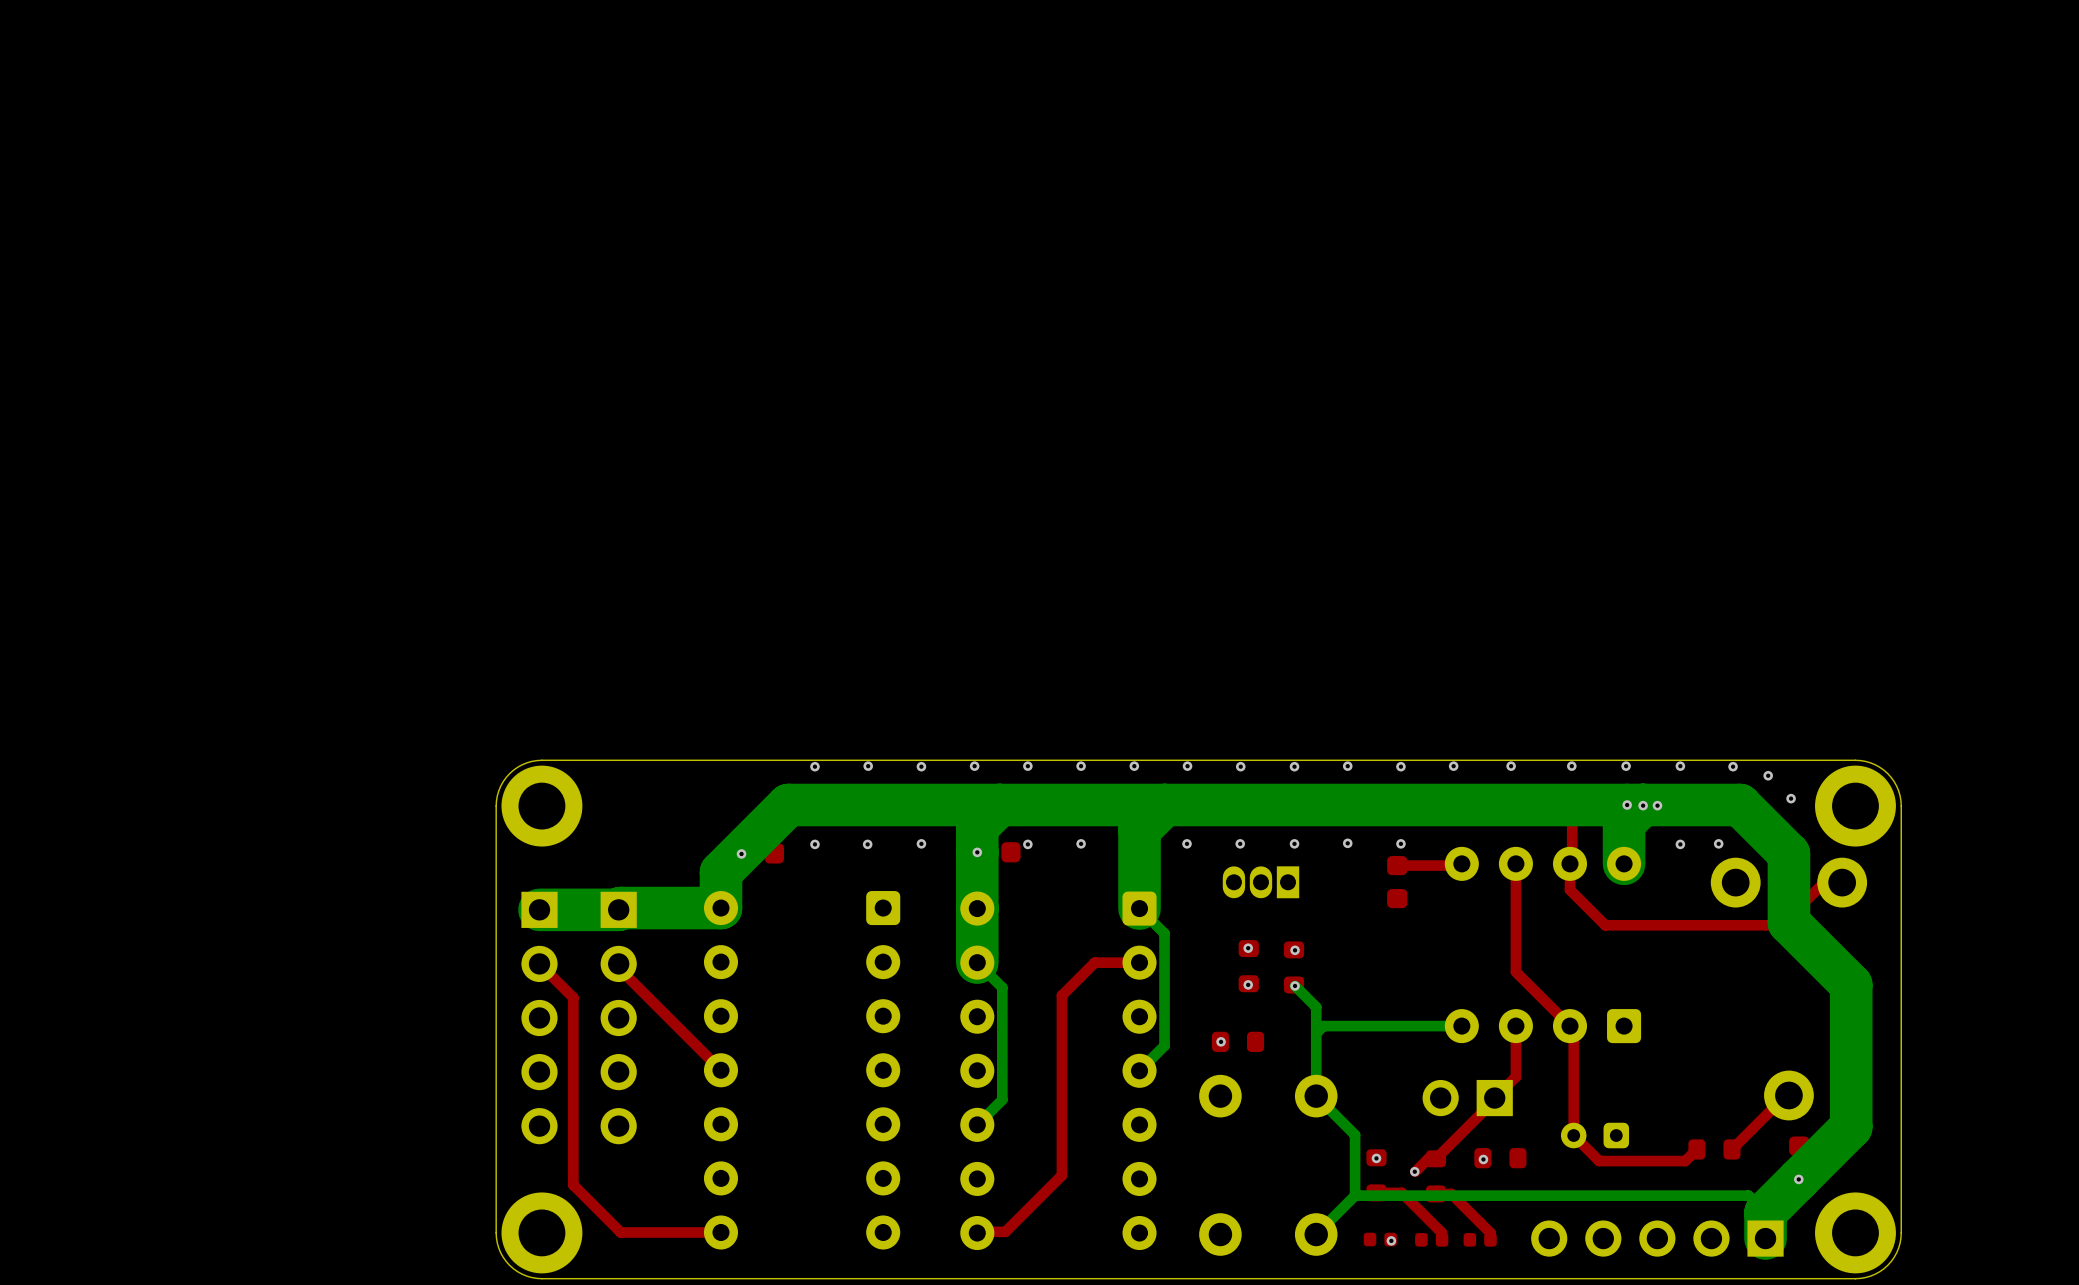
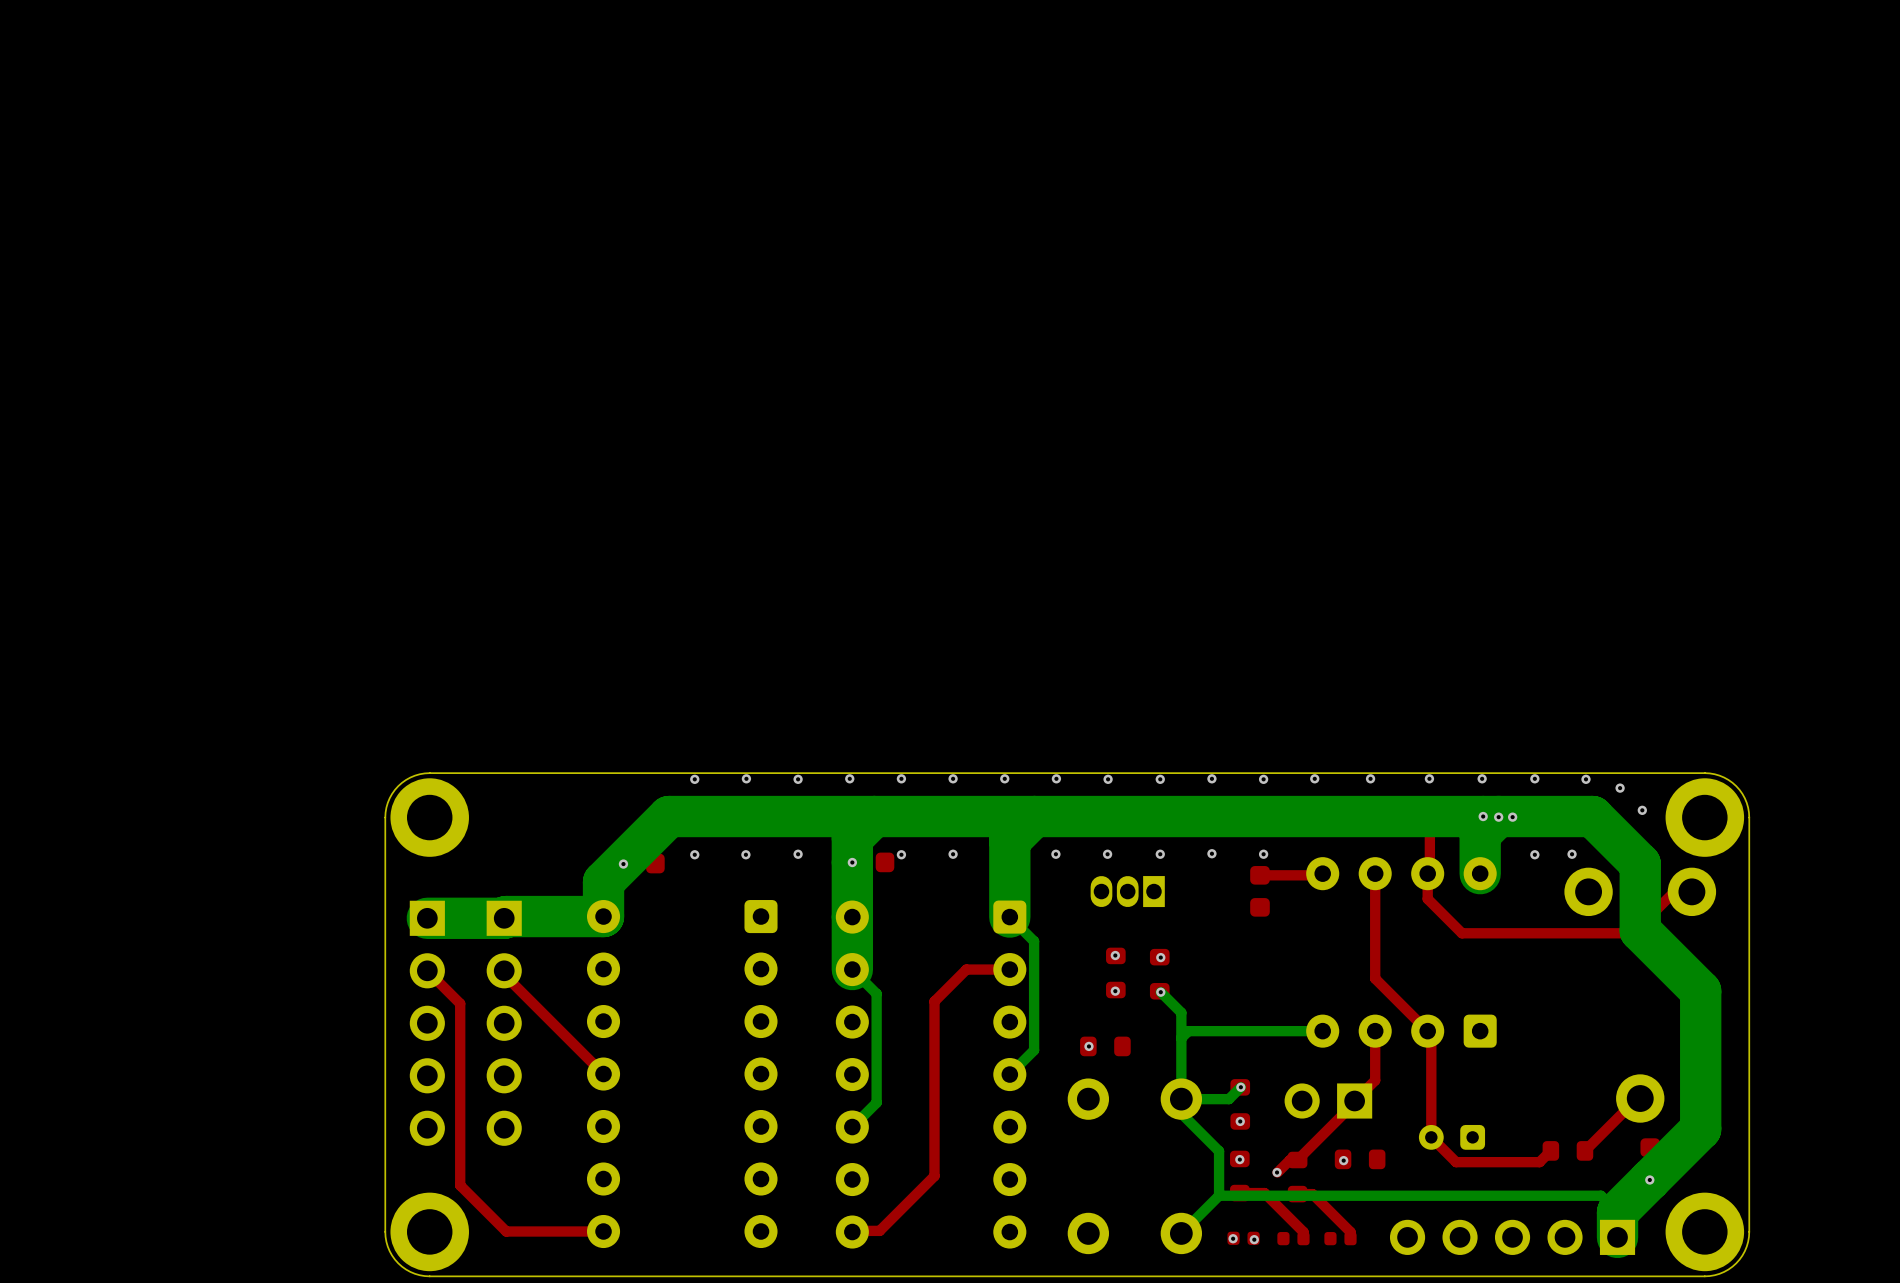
via: none -> (1240, 1087)
bottom track: (1316, 1096) (1355, 1134) (1355, 1149) -> (1240, 1087) (1228, 1099) (1181, 1099) (1181, 1113) (1219, 1151)
part: none -> (1240, 1104)
via: none -> (1240, 1121)
via: none -> (1233, 1238)

